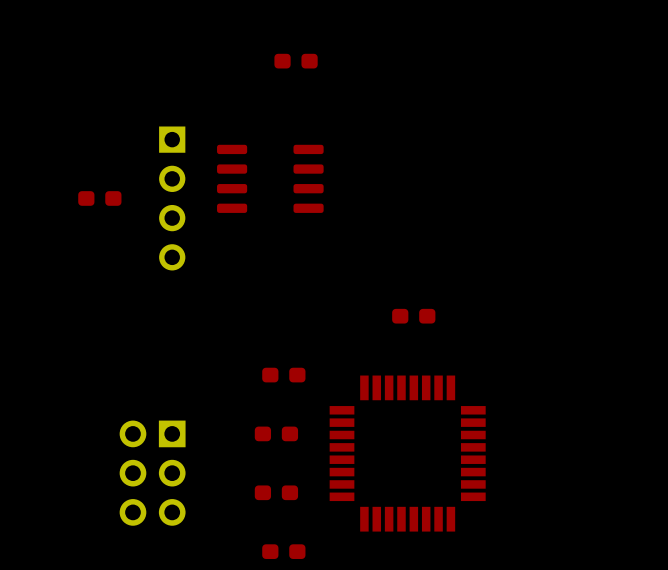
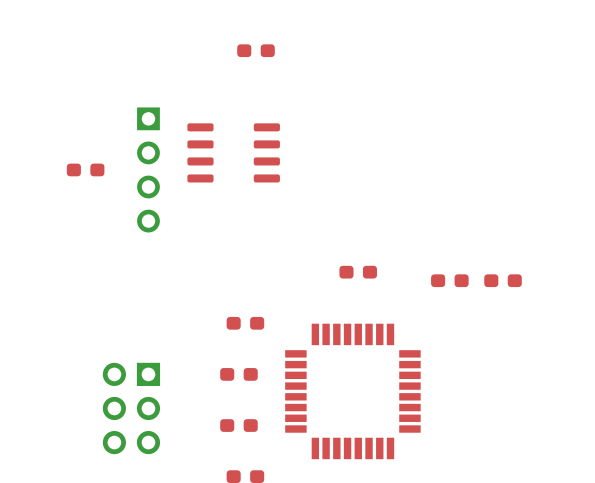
part: none -> (449, 280)
part: none -> (503, 280)

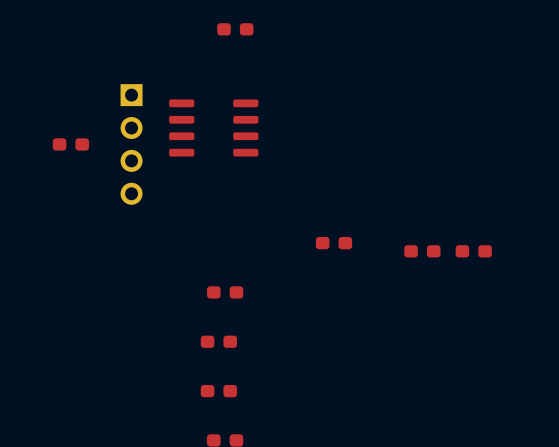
part: (352, 391) -> none
part: (131, 408) -> none

